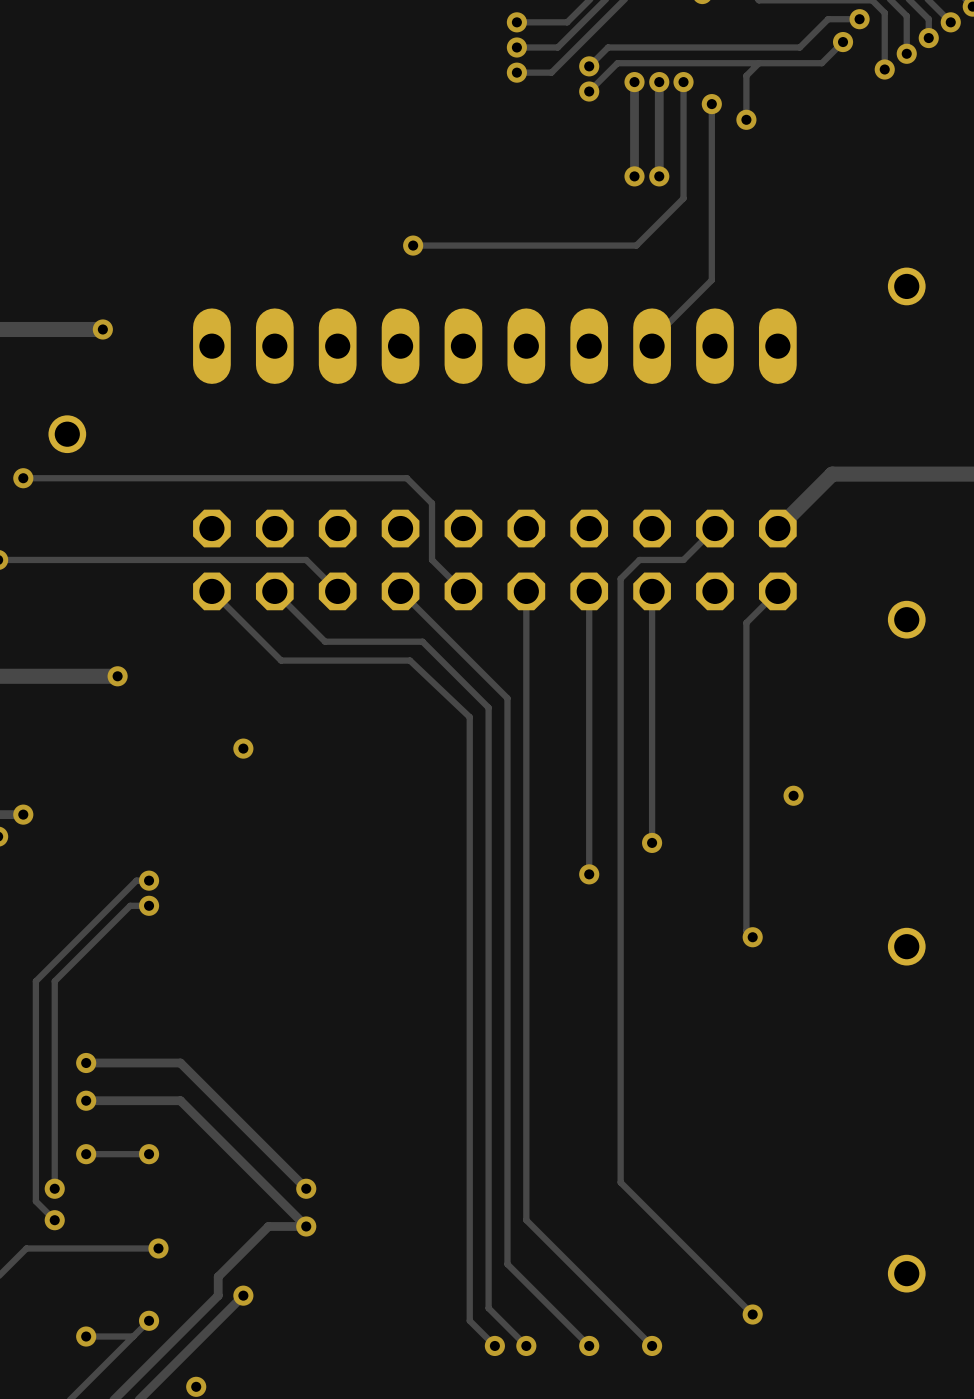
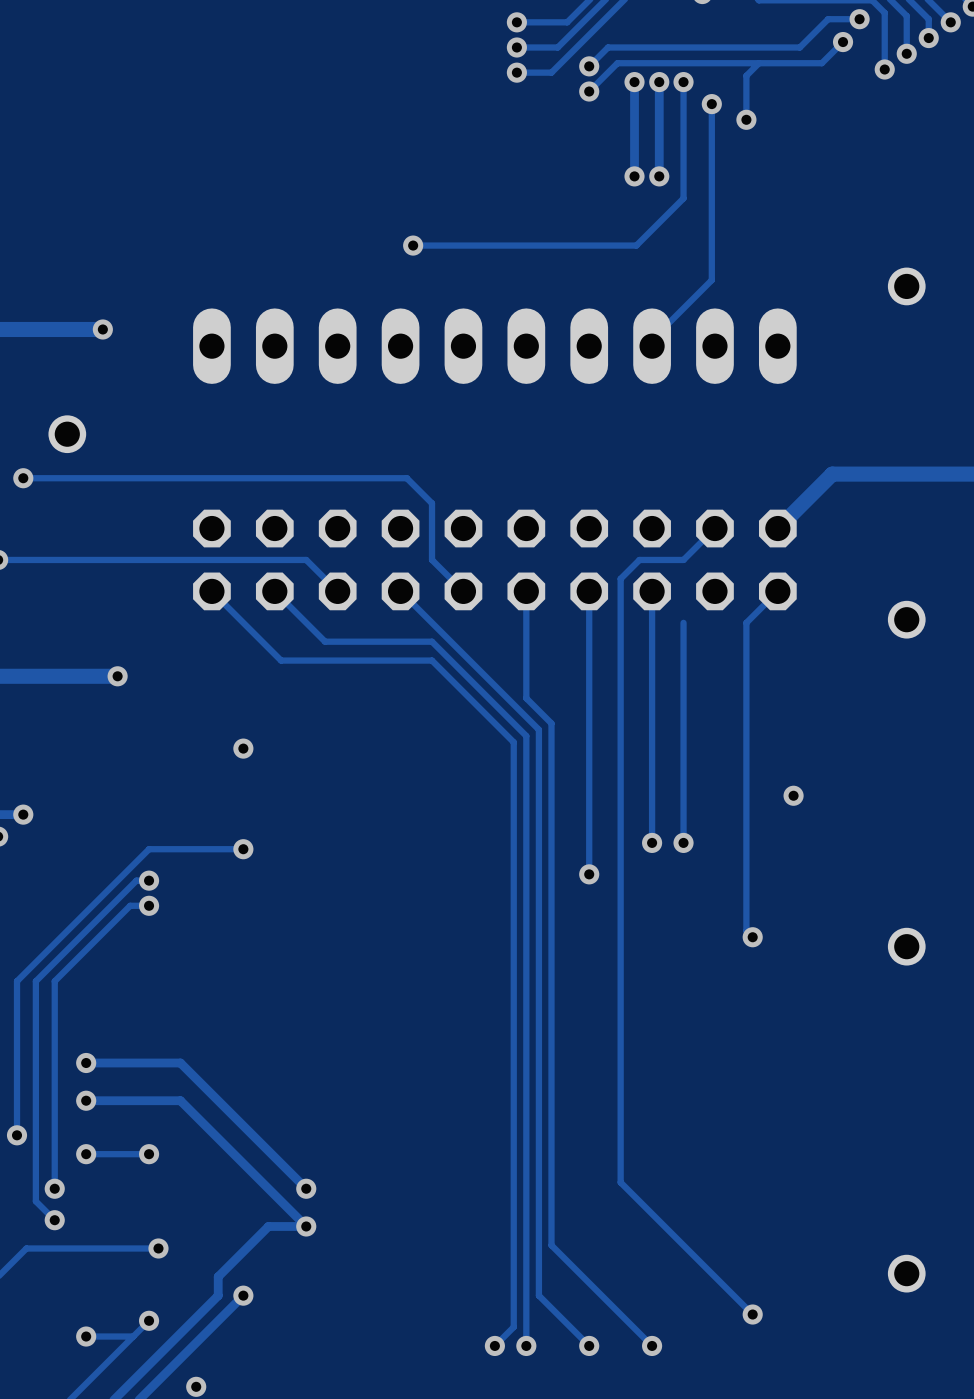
track: none -> (683, 622) (683, 842)
track: (422, 641) (488, 707) (488, 1308) (526, 1345) -> none
track: (410, 660) (469, 717) (469, 1320) (494, 1345) -> (410, 660) (432, 660) (513, 742) (513, 1327) (494, 1345)
track: (507, 698) (507, 1264) (538, 1295) -> (507, 698) (538, 729) (538, 1295)
track: (526, 698) (526, 736) -> (422, 641) (432, 641) (526, 736)
track: none -> (526, 698) (551, 723) (551, 1245)
via: none -> (683, 842)
track: none -> (243, 849) (149, 849) (17, 981) (17, 1135)
via: none -> (243, 849)
via: none -> (17, 1135)
track: (526, 1220) (551, 1245) -> (526, 1220) (526, 1345)

